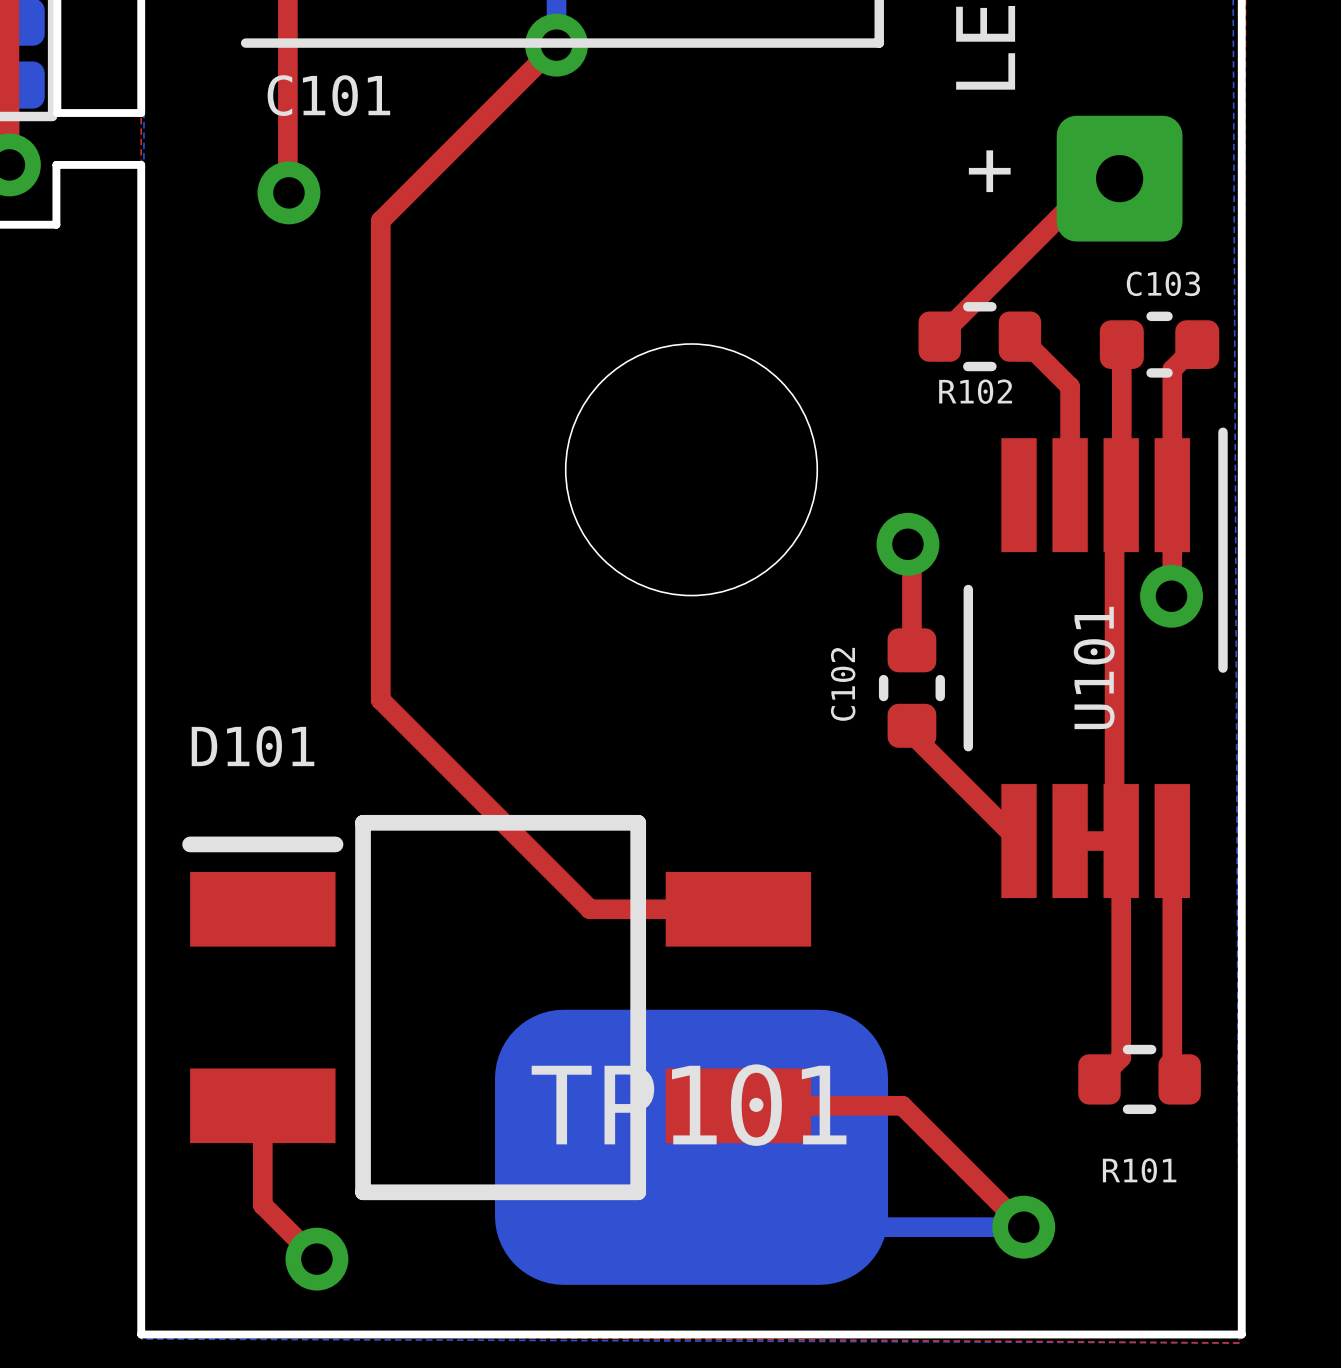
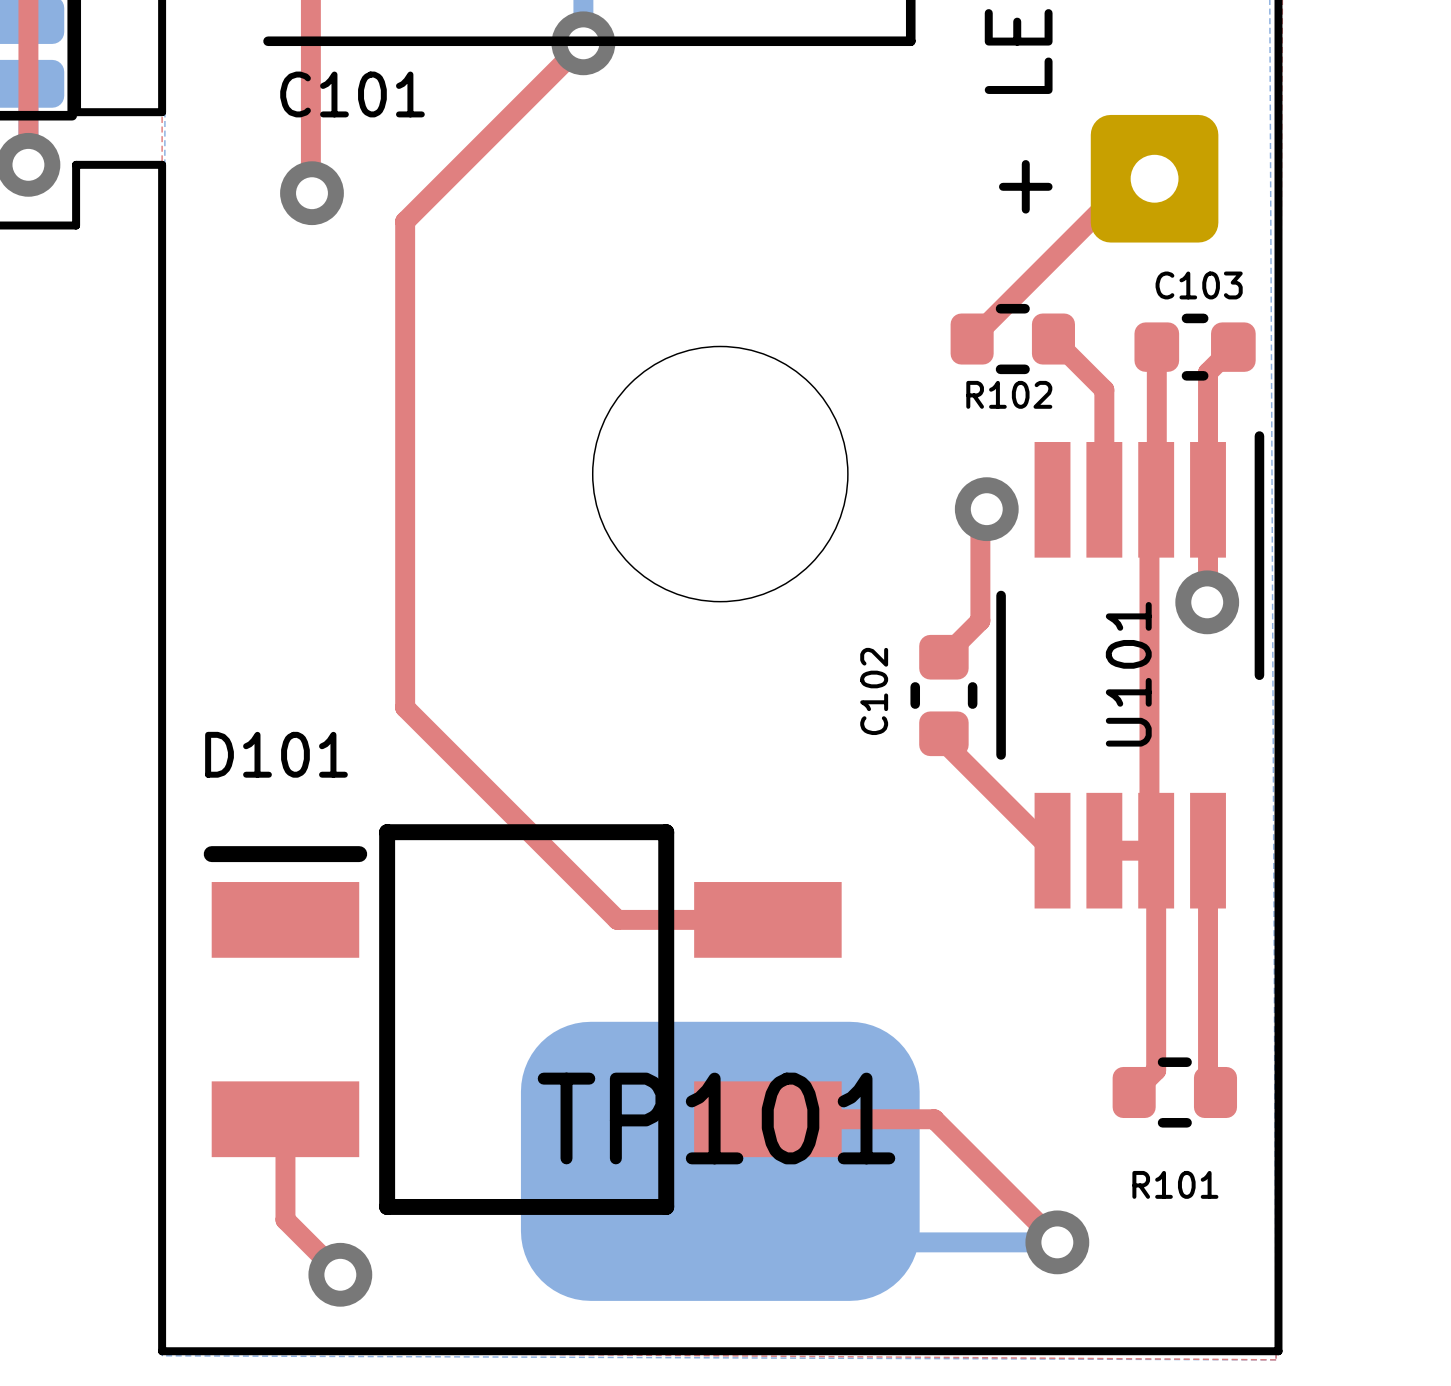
top track: (907, 544) (911, 548) (911, 650) -> (986, 509) (980, 515) (980, 620) (943, 657)
via position: (907, 544) -> (986, 509)

